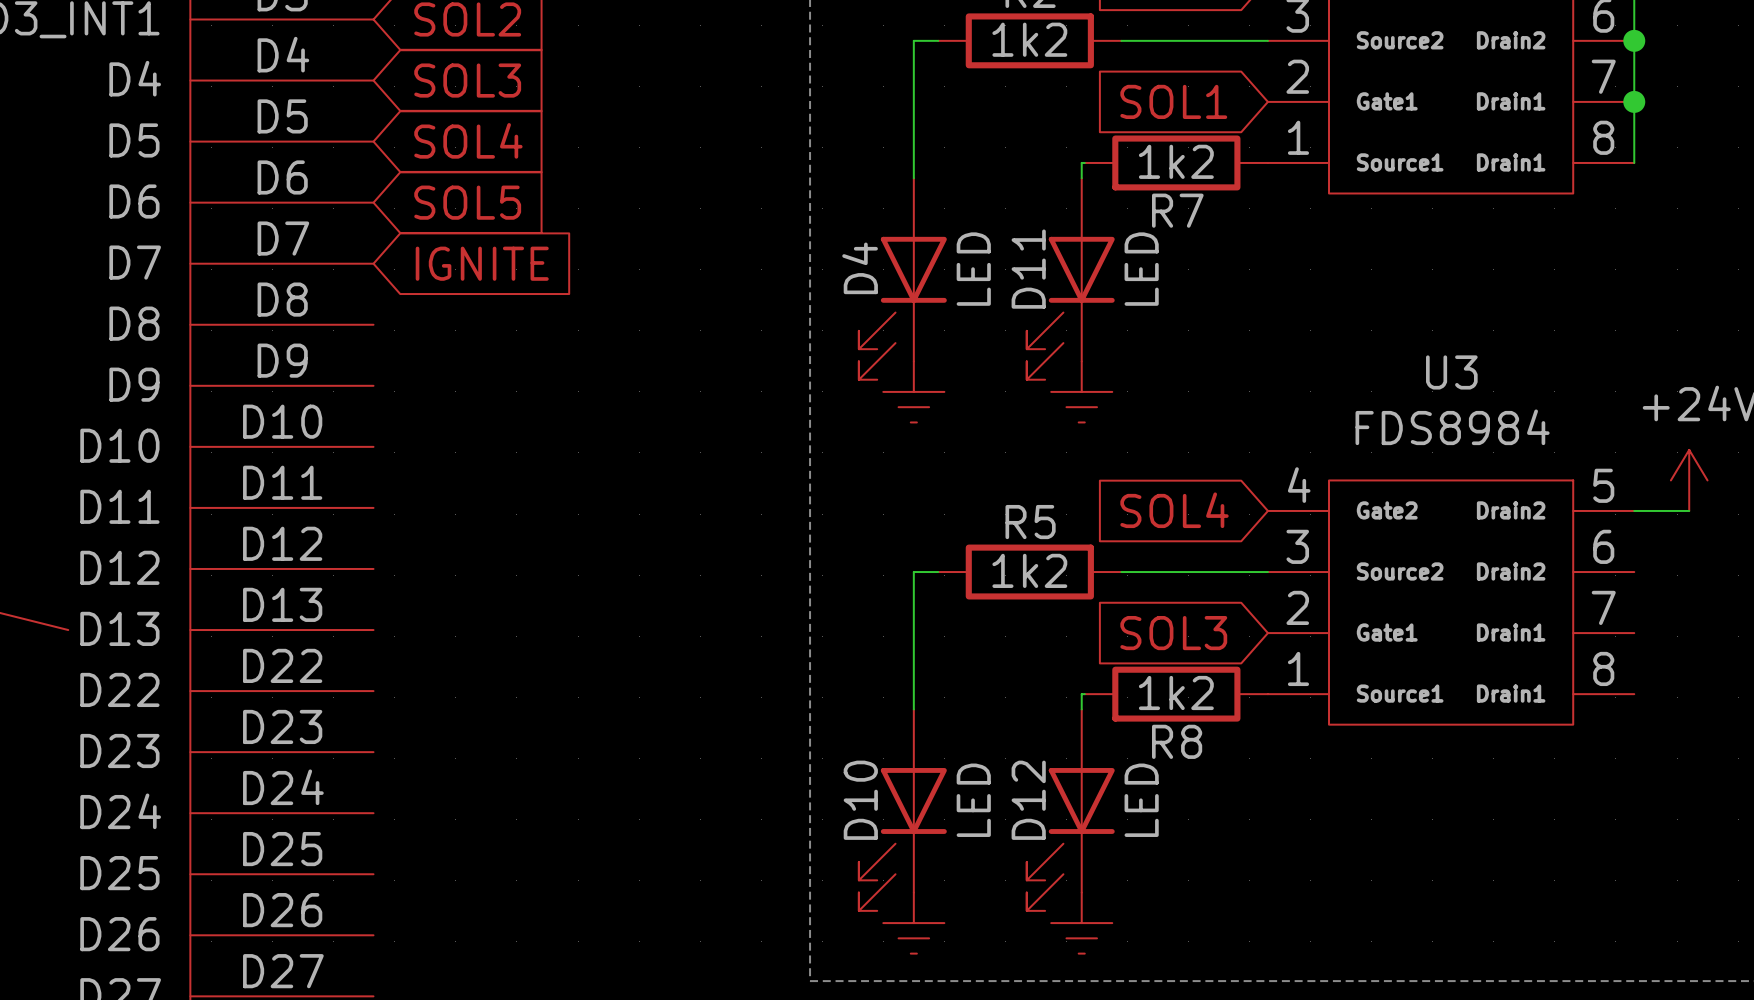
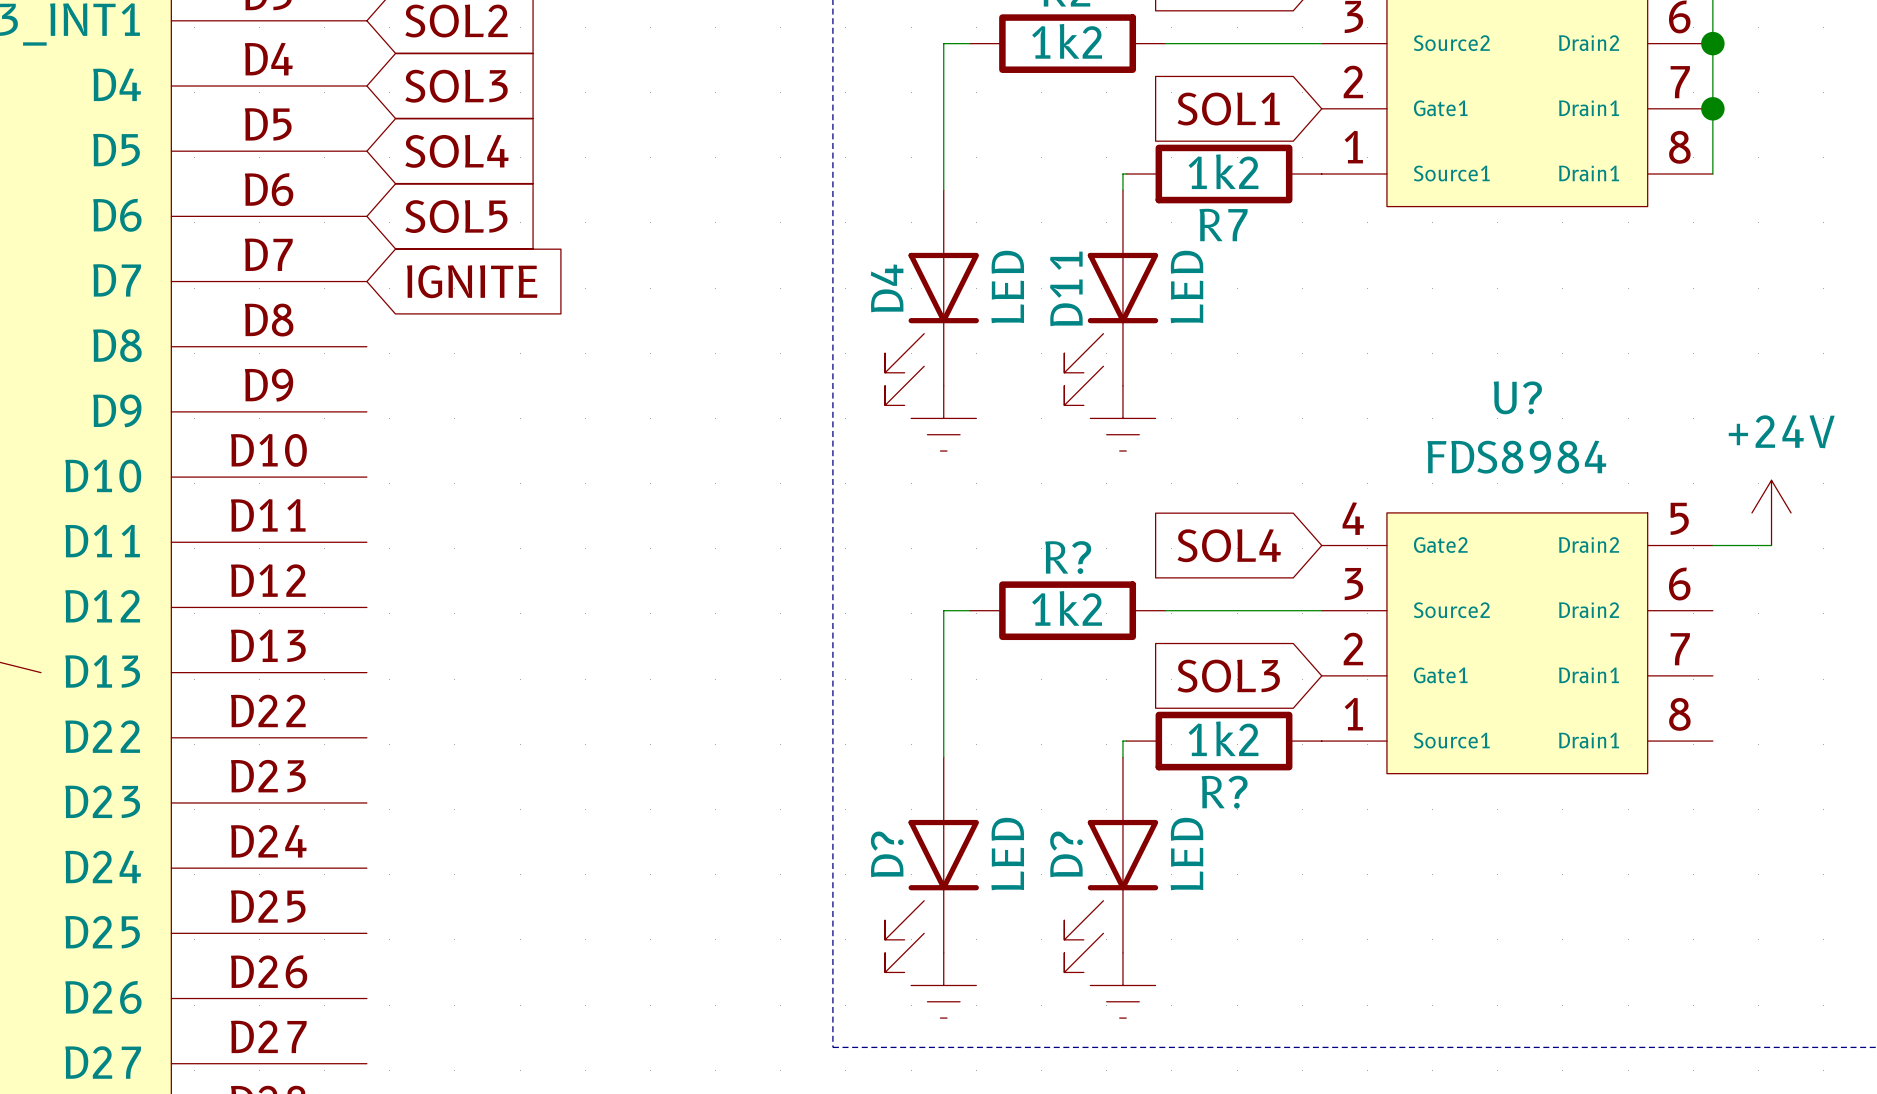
U3 name: U3 (1451, 372) -> U? (1517, 397)
R5 name: R5 (1030, 522) -> R? (1068, 557)
R8 name: R8 (1177, 741) -> R? (1224, 792)
D10 name: D10 (860, 800) -> D? (887, 854)
D12 name: D12 (1028, 800) -> D? (1066, 854)

